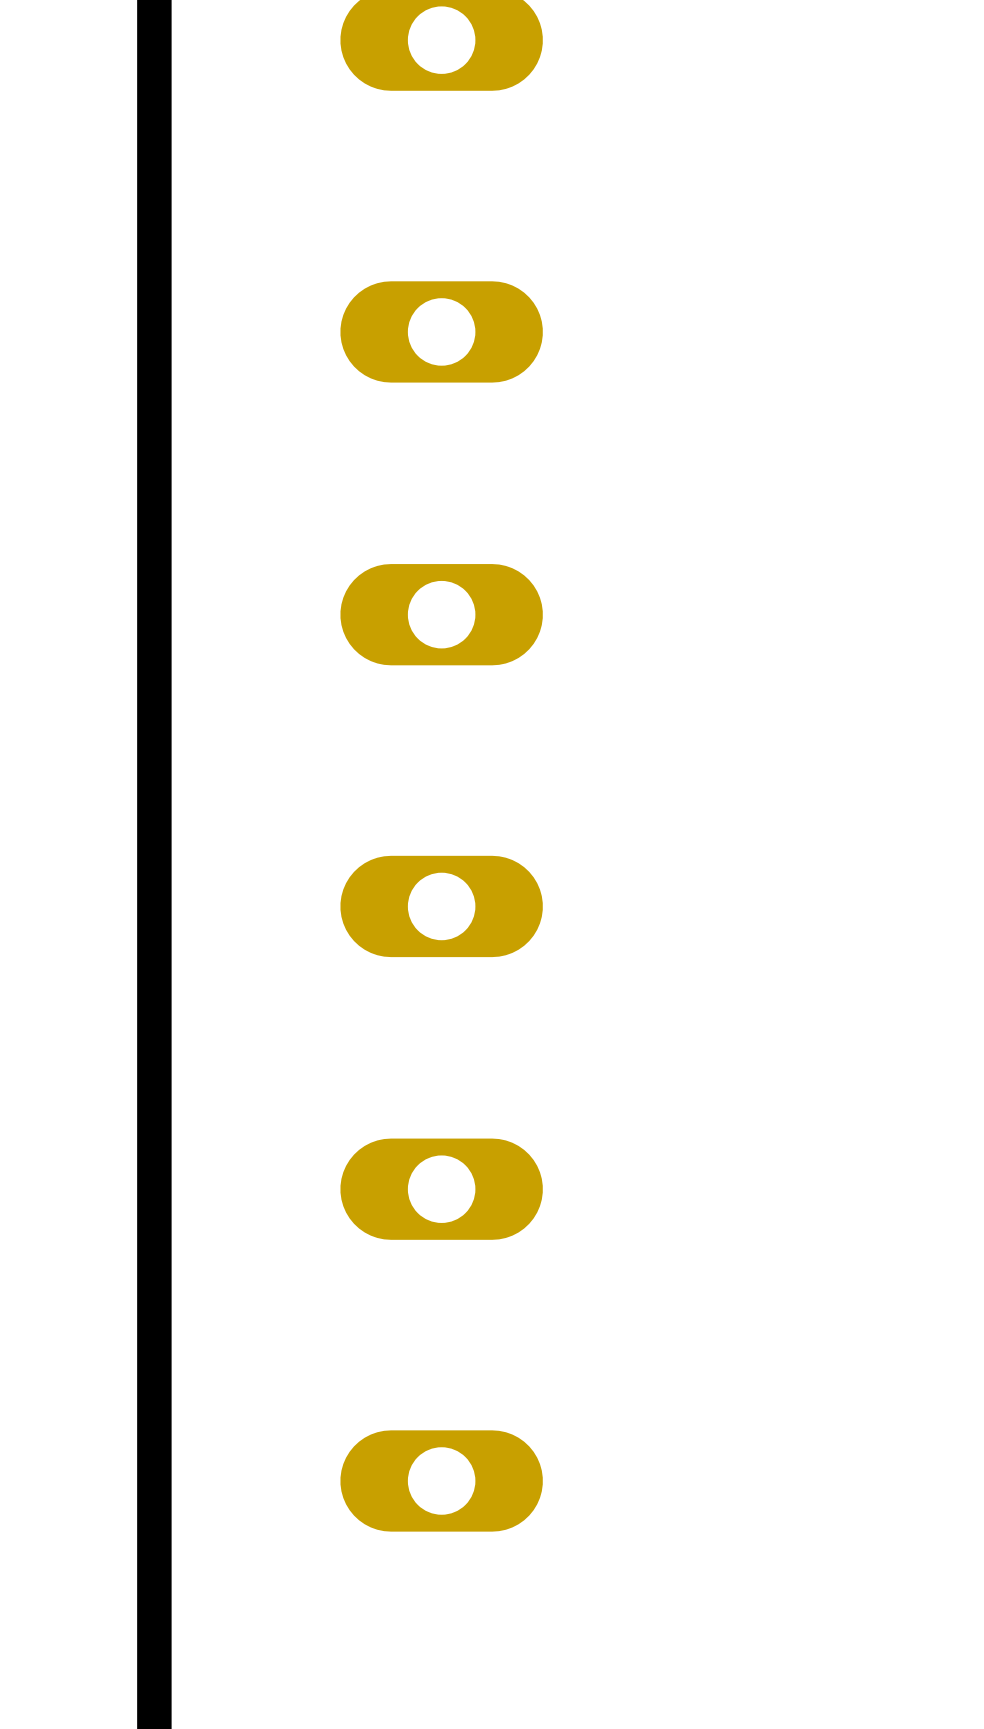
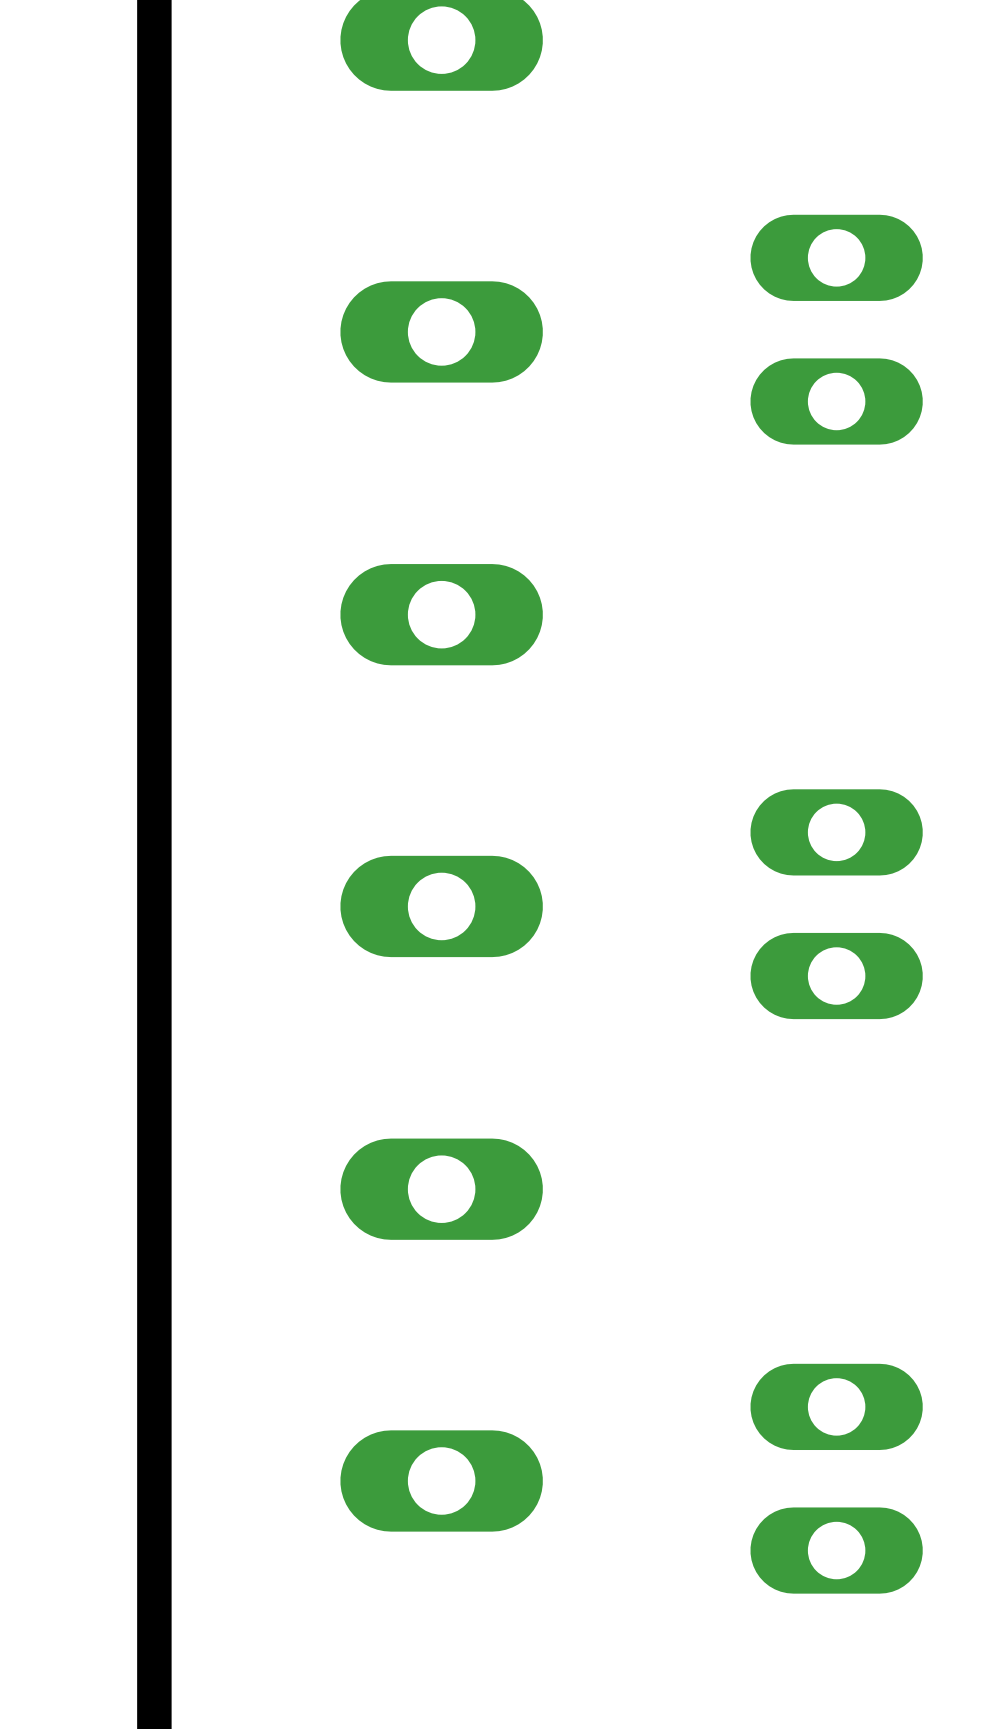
part: none -> (836, 329)
part: none -> (836, 904)
part: none -> (836, 1478)

